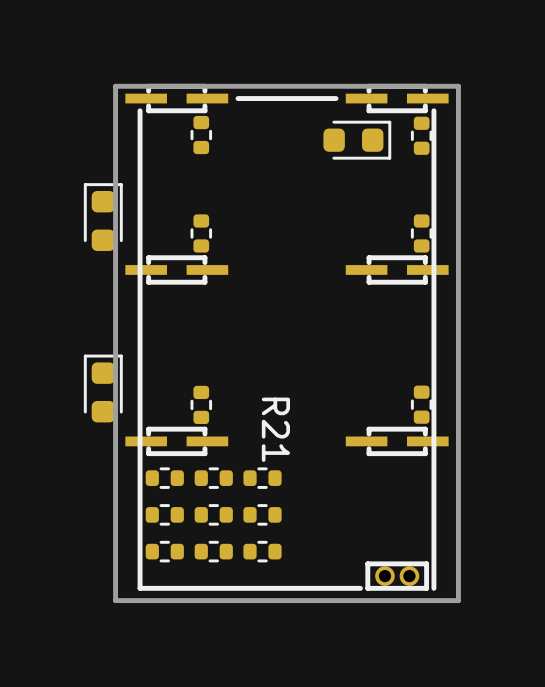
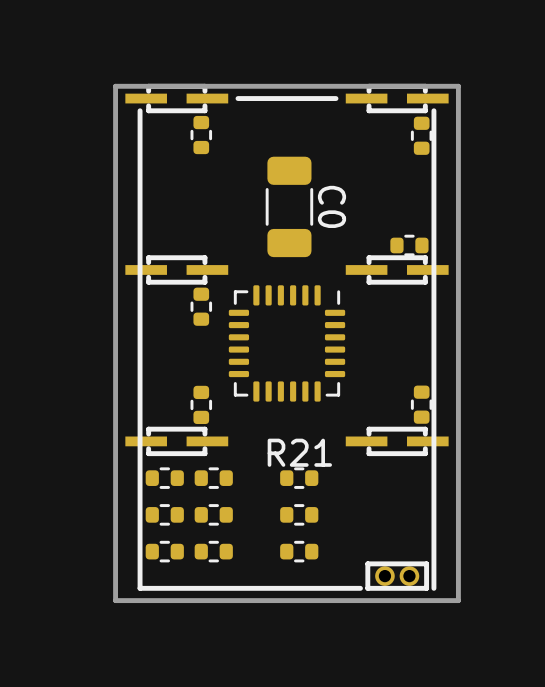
part: (357, 140) -> none
C0: none -> (289, 206)
part: (103, 217) -> none
part position: (201, 233) -> (201, 306)
part rotation: 0° (421, 233) -> 90° clockwise (409, 245)
part: none -> (286, 343)
part: (103, 388) -> none
R21 name rotation: 0° (275, 429) -> 90° counterclockwise (299, 452)
R21 position: (262, 478) -> (299, 478)
part: (262, 514) -> none
part: none -> (299, 514)
part: (262, 551) -> none
part: none -> (299, 551)

